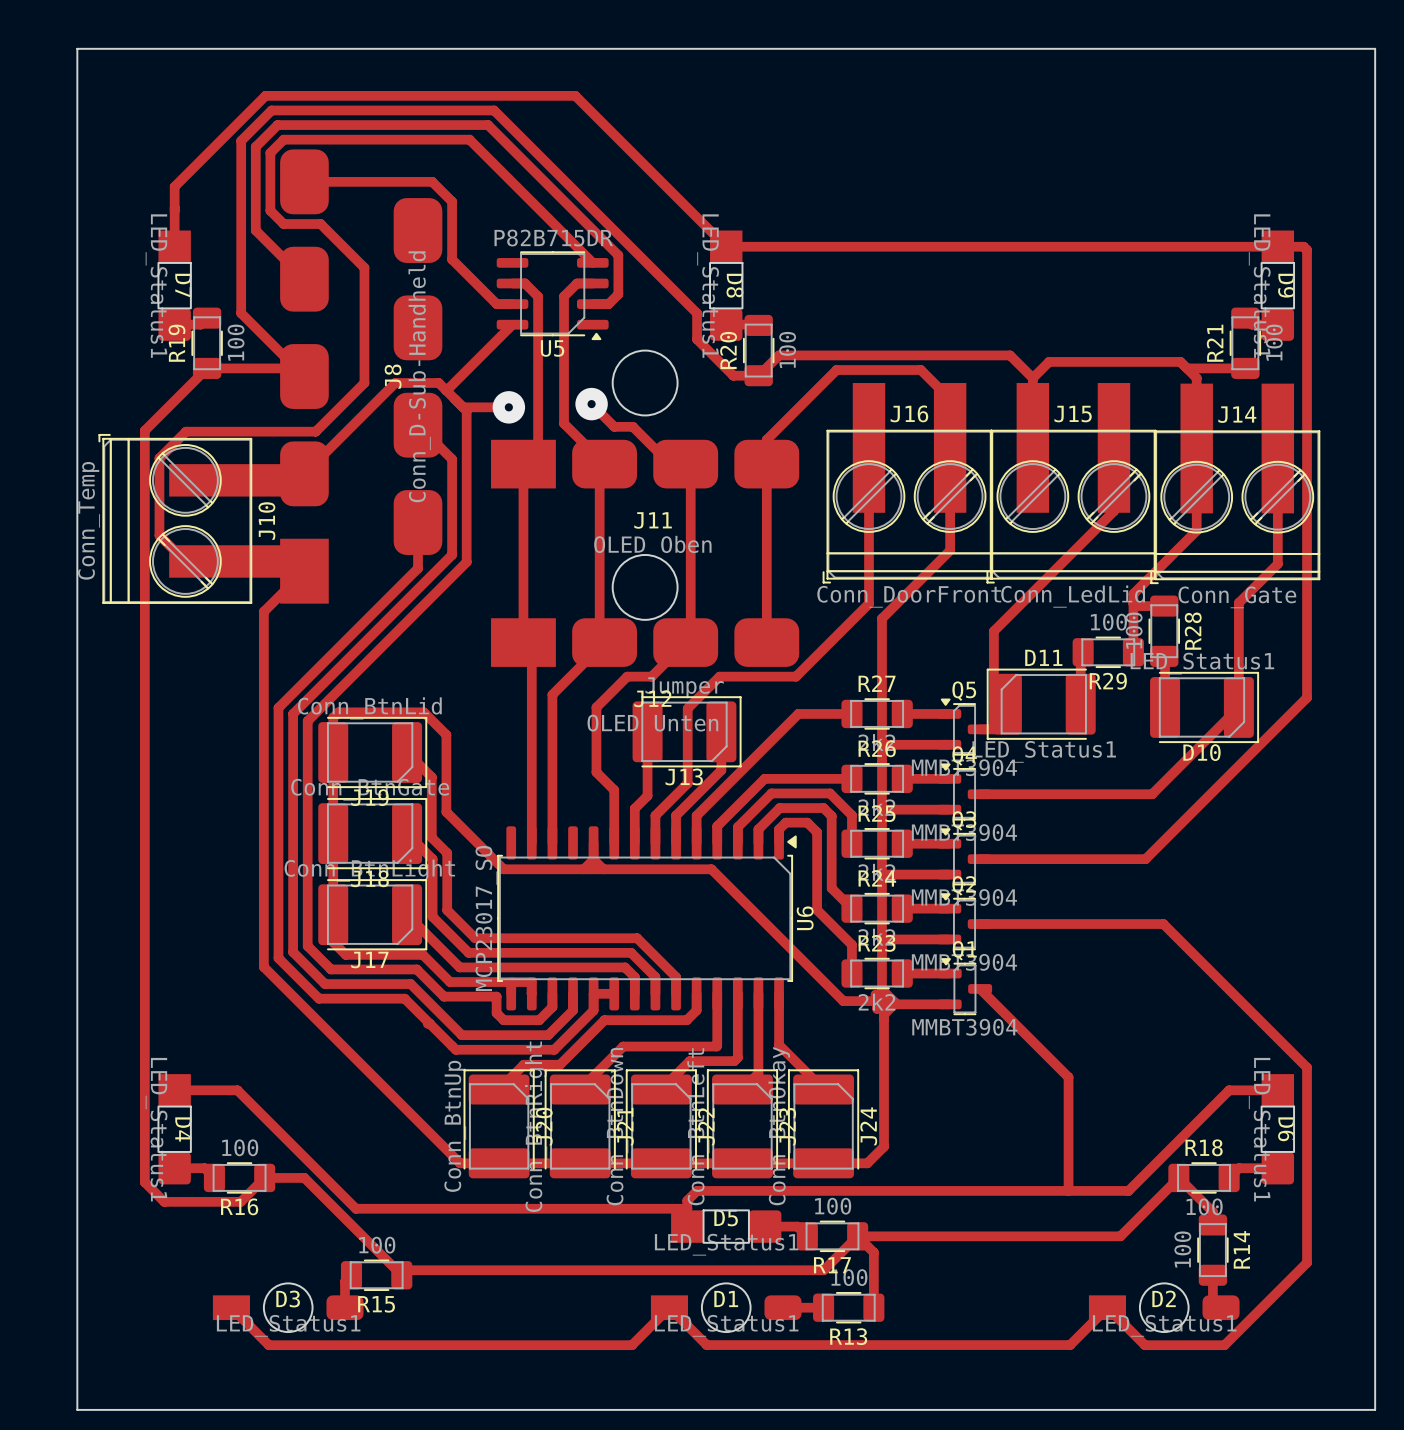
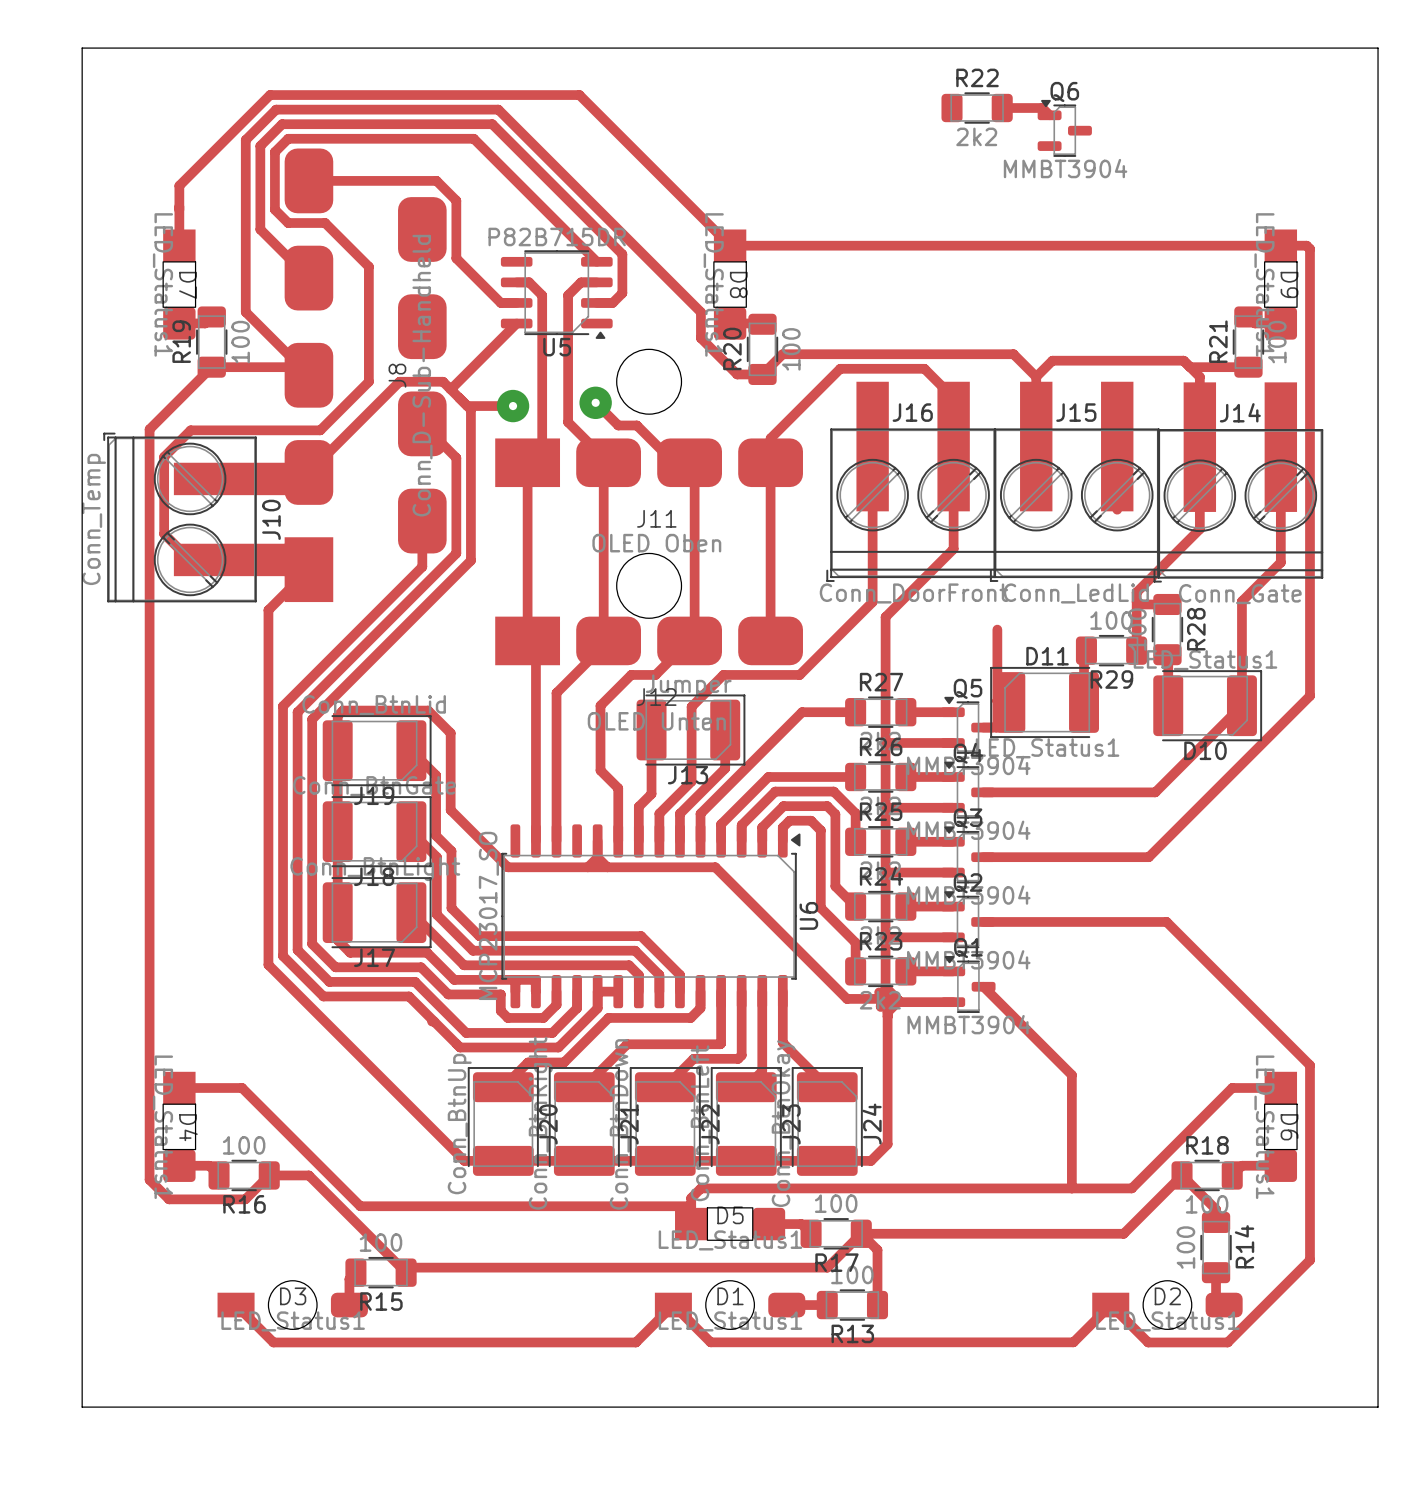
R22: none -> 2k2 (977, 108)
track: none -> (1002, 108) (1042, 108) (1049, 115)
Q6: none -> MMBT3904 (1064, 128)
track: (1113, 511) (993, 631) -> none

